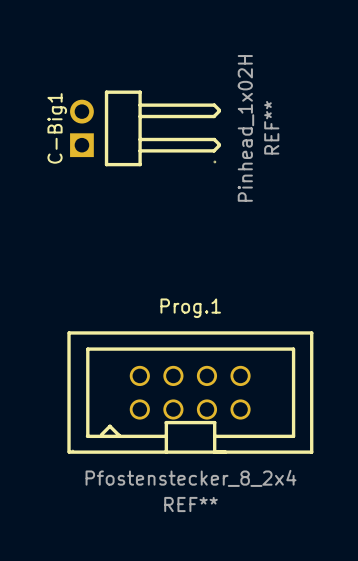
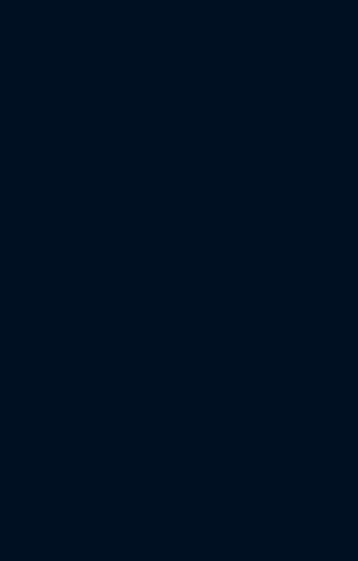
C-Big1: Pinhead_1x02H (145, 128) -> none
Prog.1: Pfostenstecker_8_2x4 (190, 392) -> none

